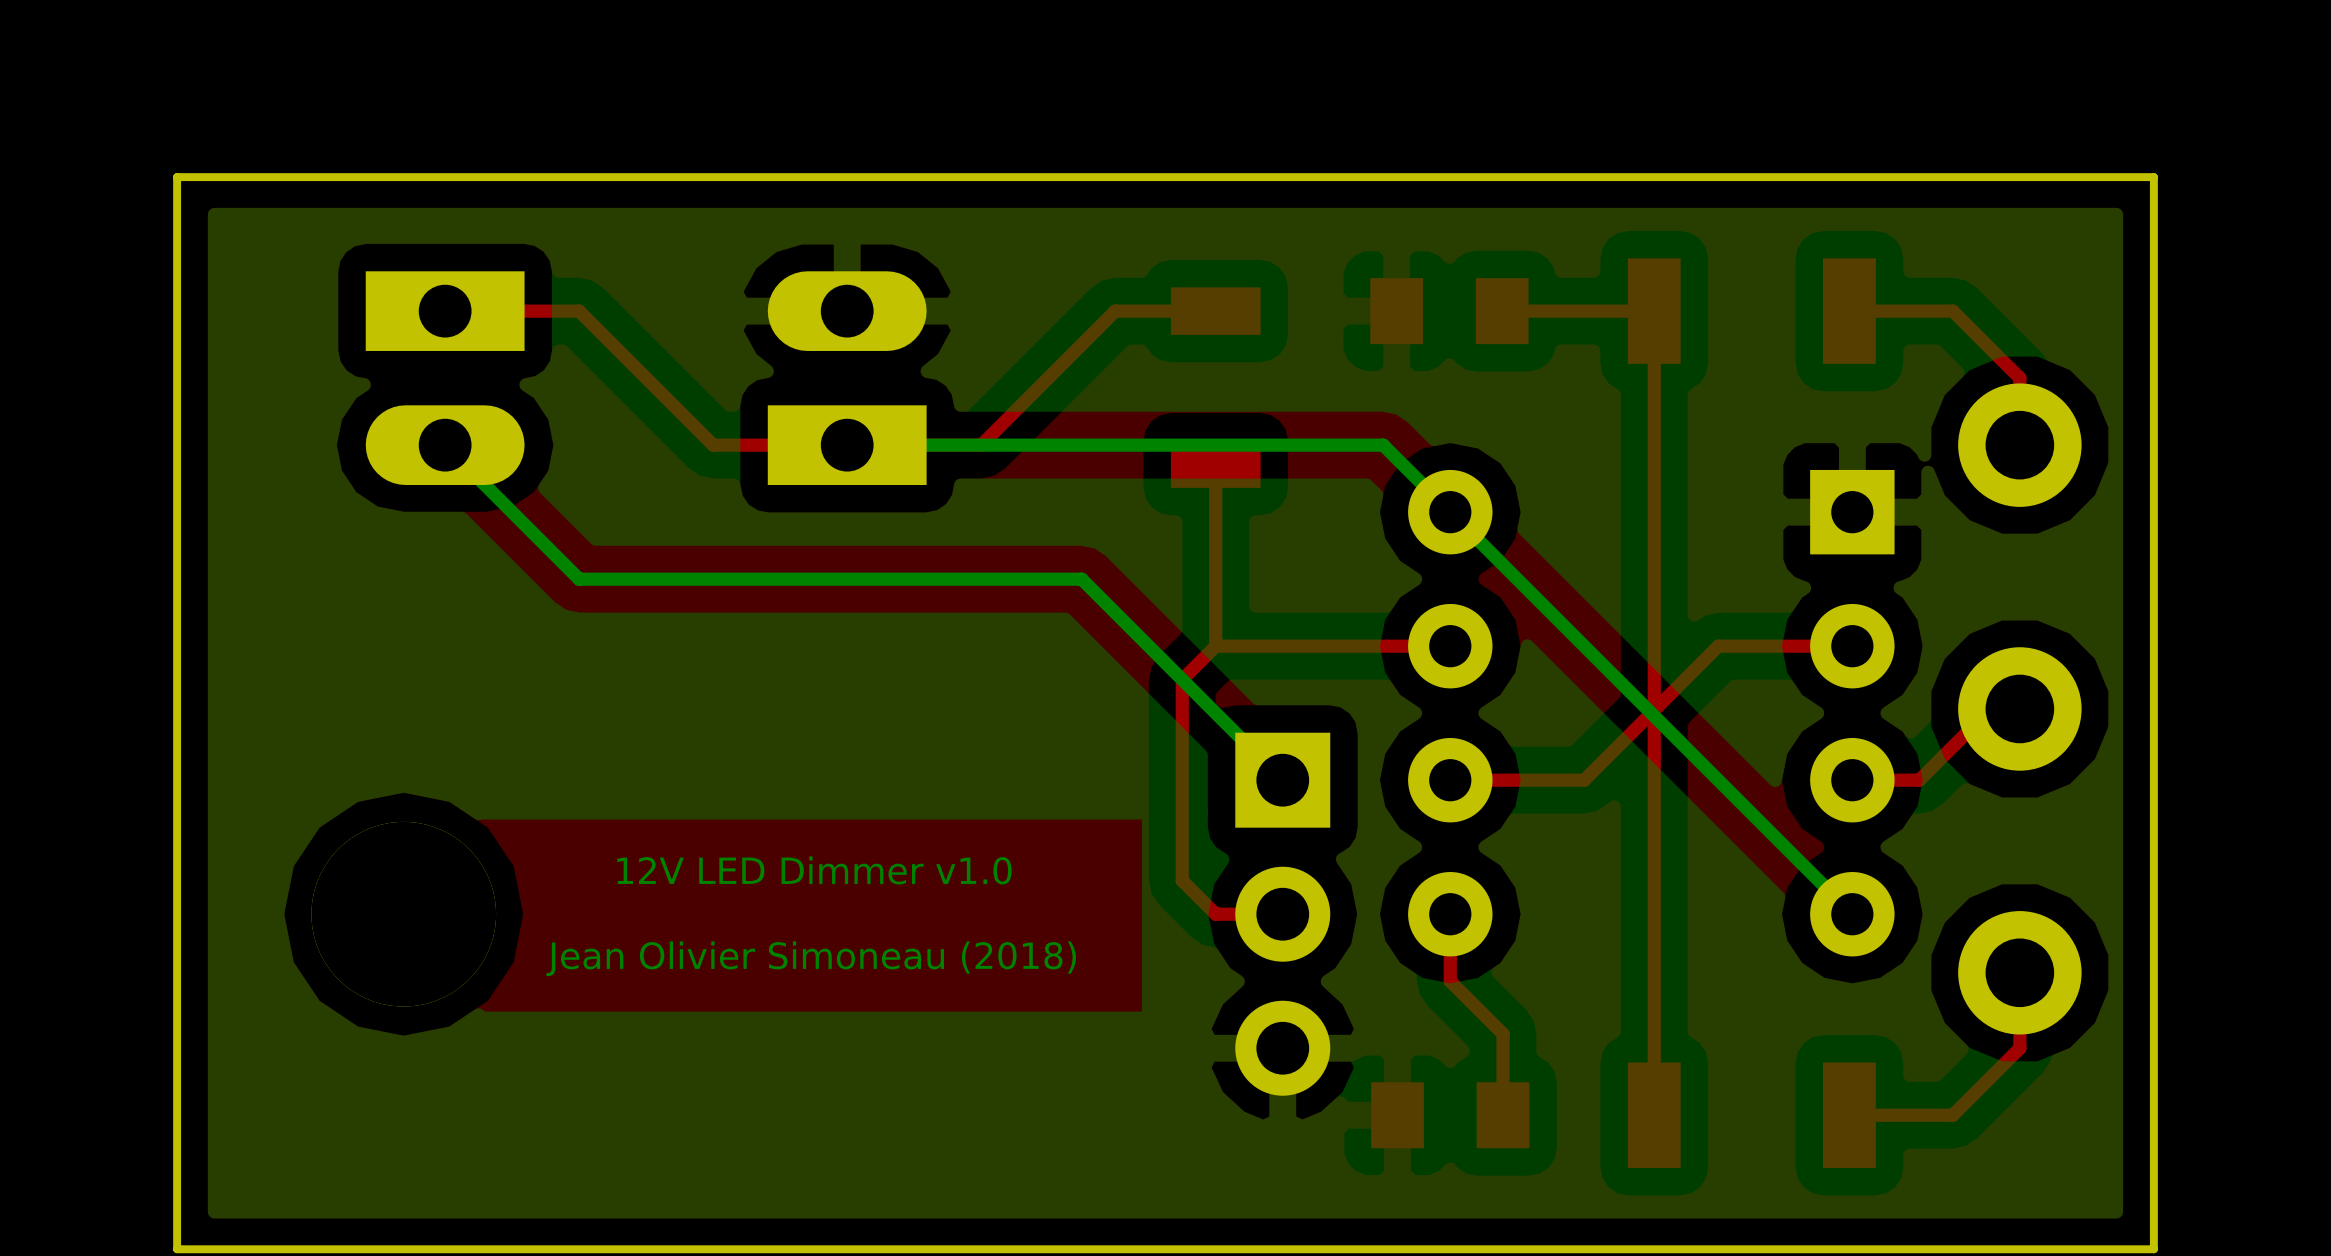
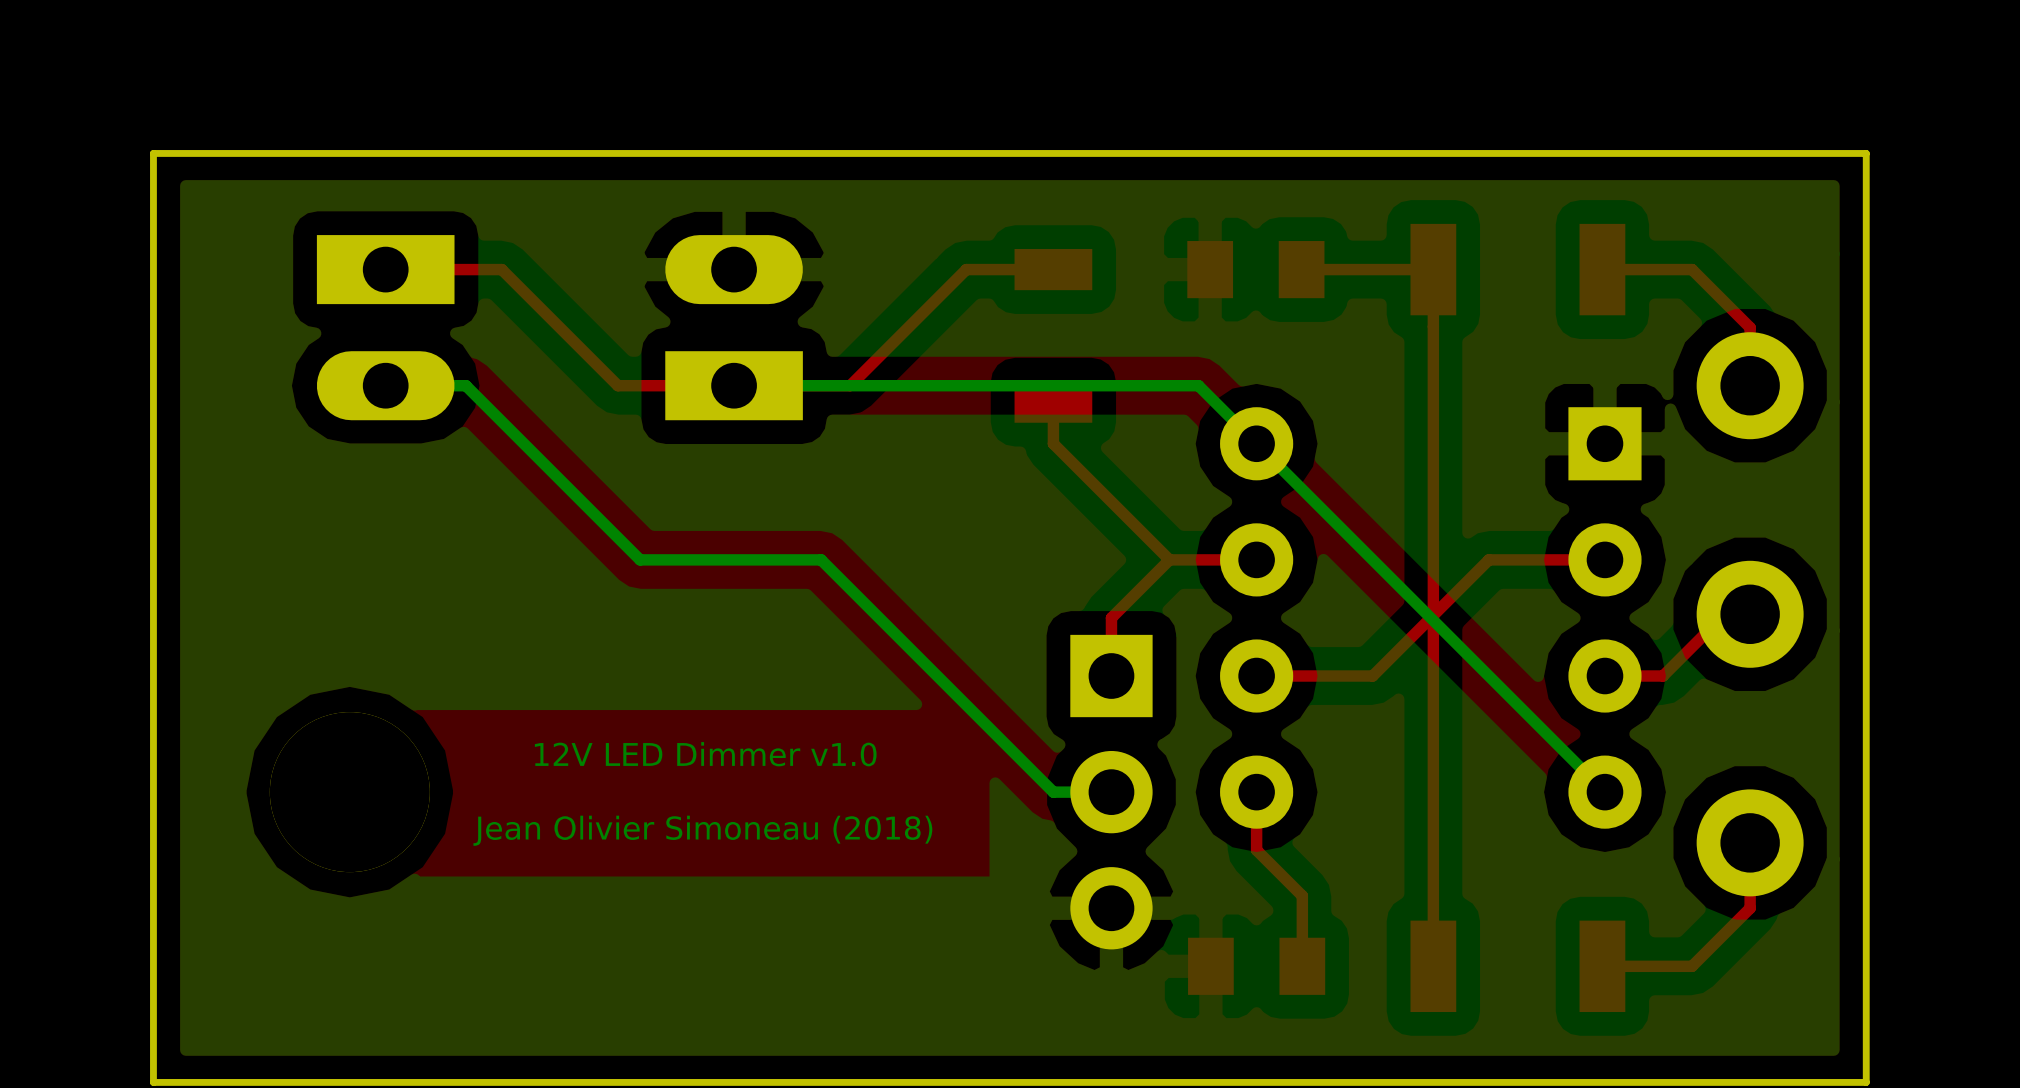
bottom track: (445, 445) (579, 579) (1081, 579) (1282, 780) -> (385, 385) (465, 385) (640, 559) (821, 559) (1053, 792) (1111, 792)
top track: (1215, 512) (1215, 646) -> (1053, 443) (1169, 559) (1111, 617) (1111, 676)
top track: (1215, 646) (1182, 679) (1182, 880) (1215, 914) (1282, 914) -> none
top track: (1349, 646) (1215, 646) -> none

